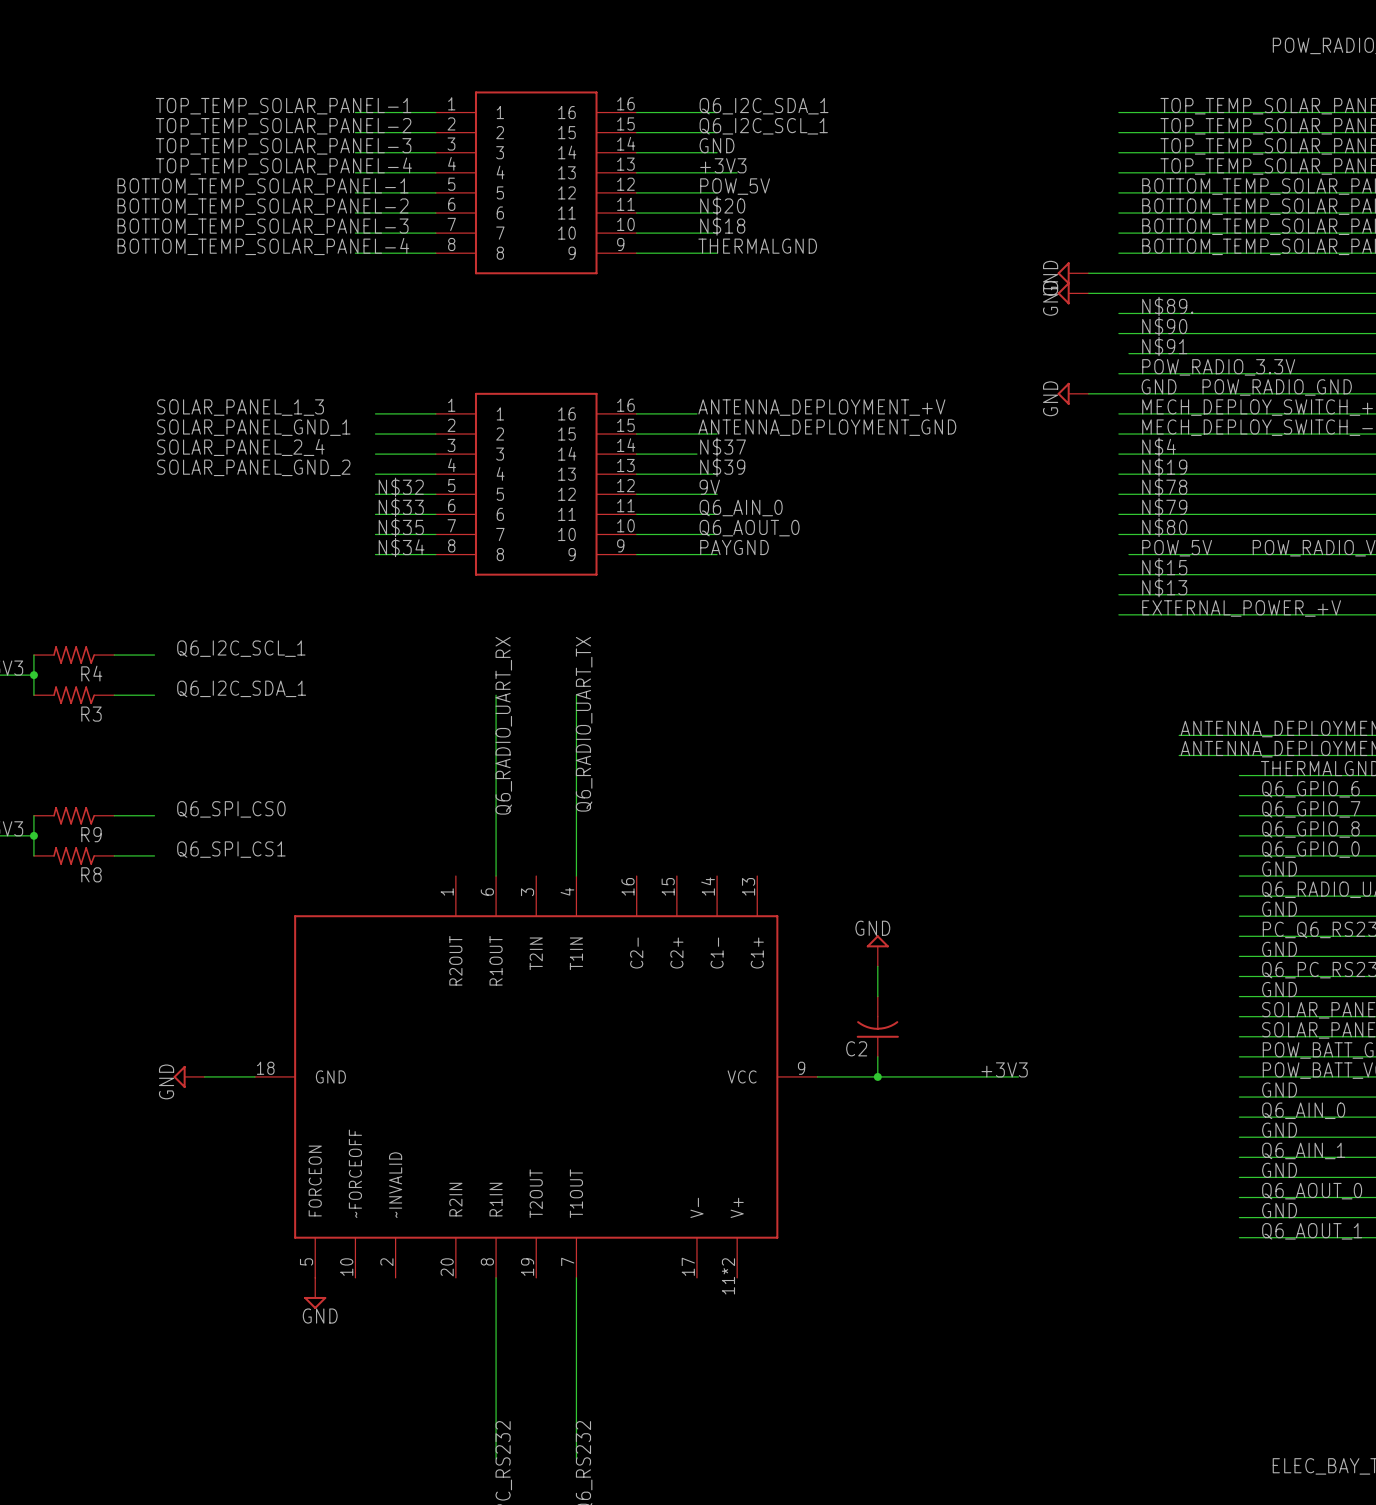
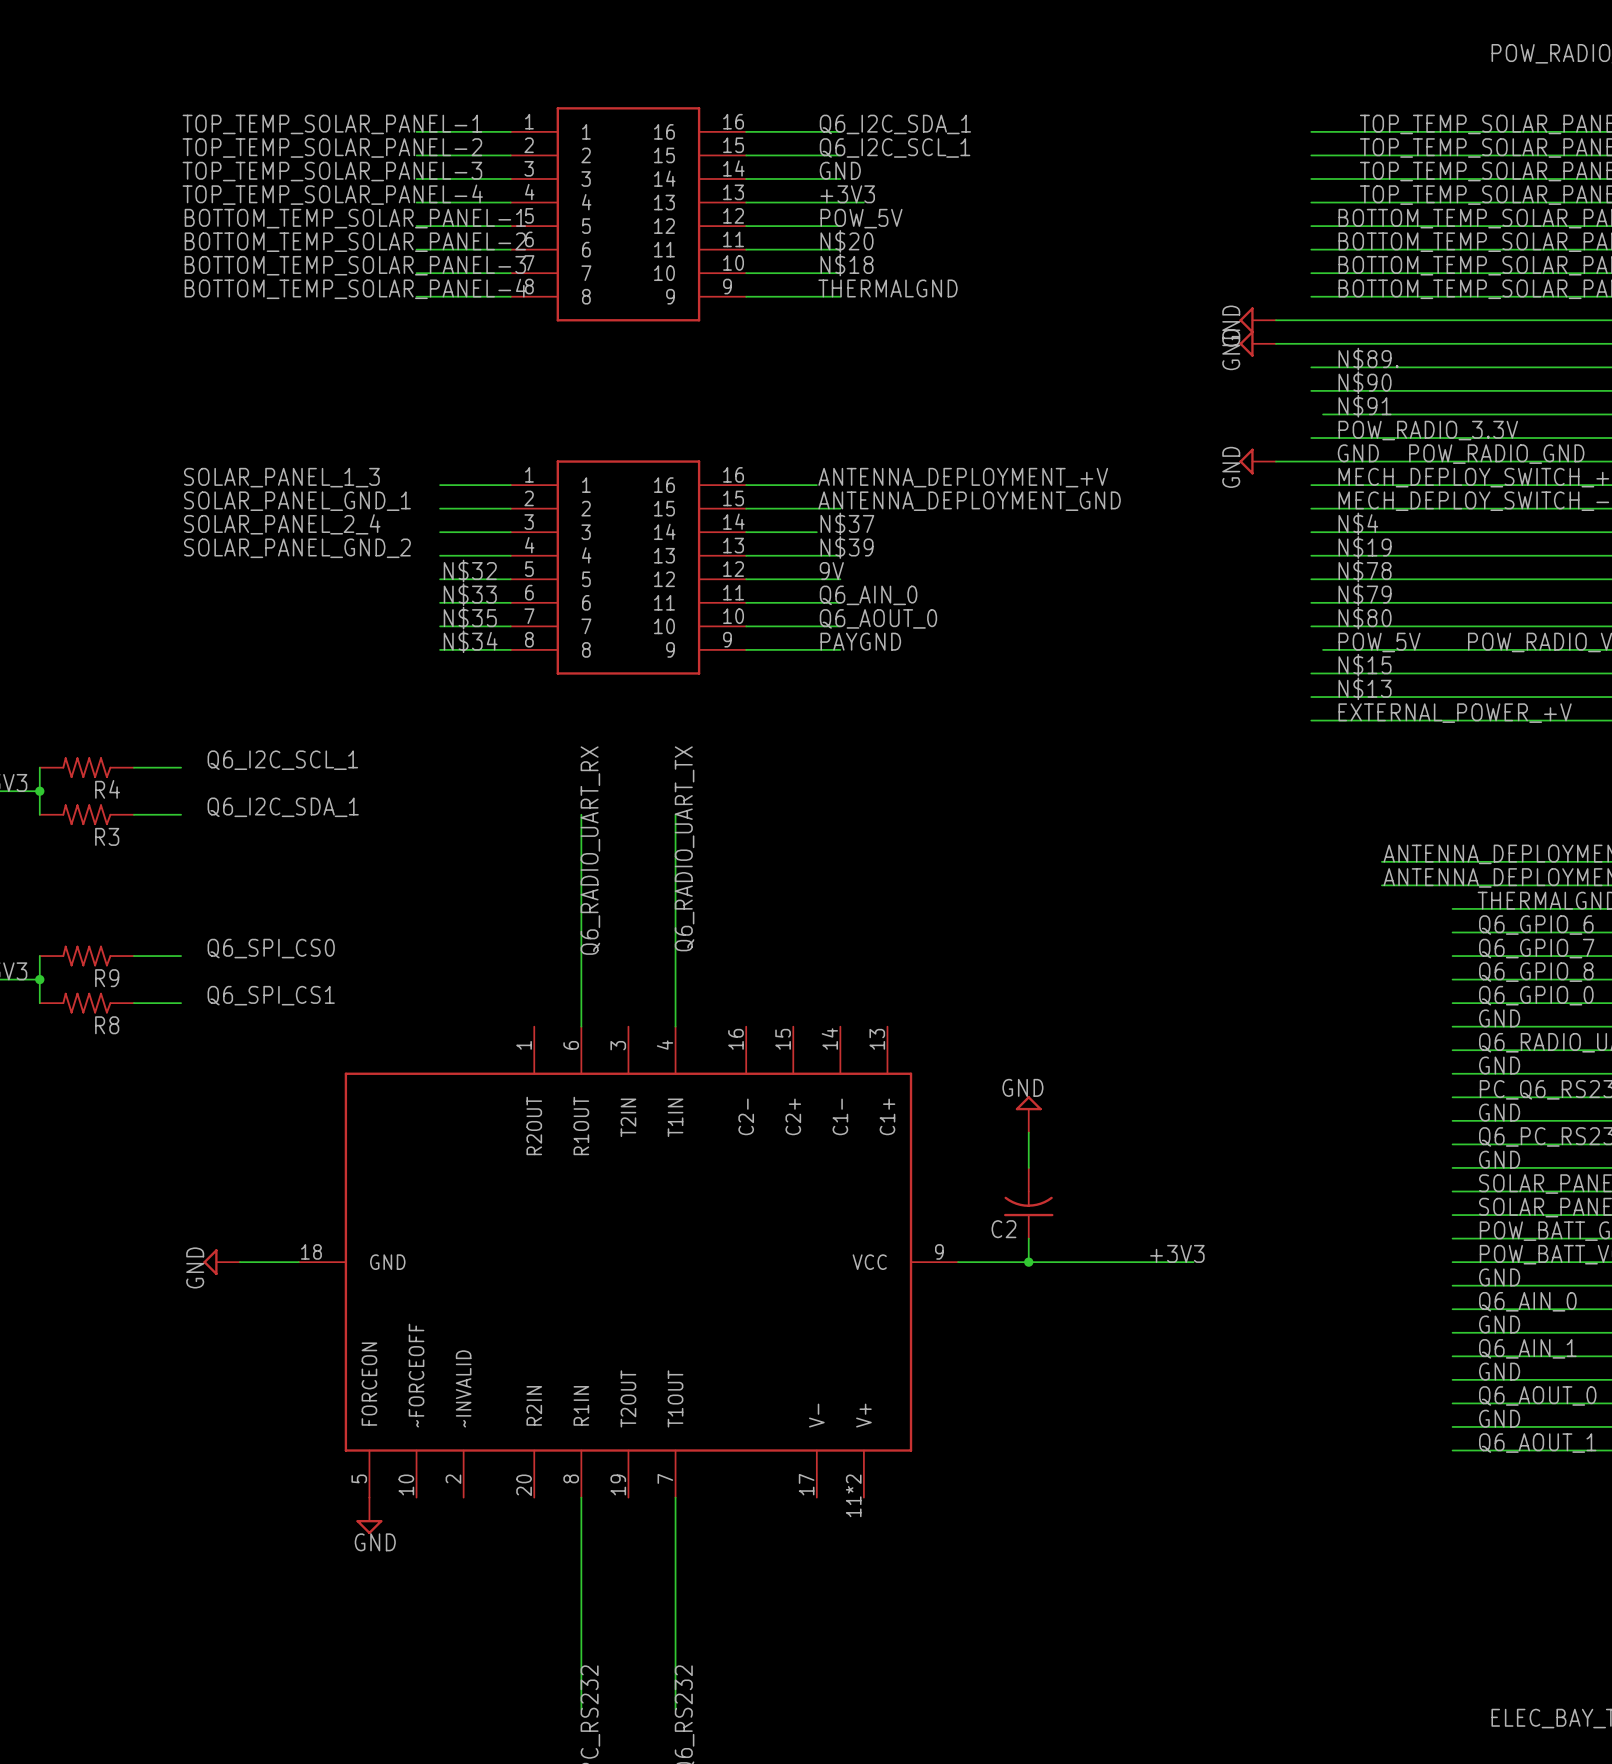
label position: BOTTOM_TEMP_SOLAR_PANEL-1 (263, 186) -> BOTTOM_TEMP_SOLAR_PANEL-1 (355, 218)
label position: BOTTOM_TEMP_SOLAR_PANEL-2 (263, 206) -> BOTTOM_TEMP_SOLAR_PANEL-2 (355, 242)
label position: BOTTOM_TEMP_SOLAR_PANEL-3 (263, 226) -> BOTTOM_TEMP_SOLAR_PANEL-3 (355, 265)
label position: BOTTOM_TEMP_SOLAR_PANEL-4 (263, 246) -> BOTTOM_TEMP_SOLAR_PANEL-4 (355, 288)

